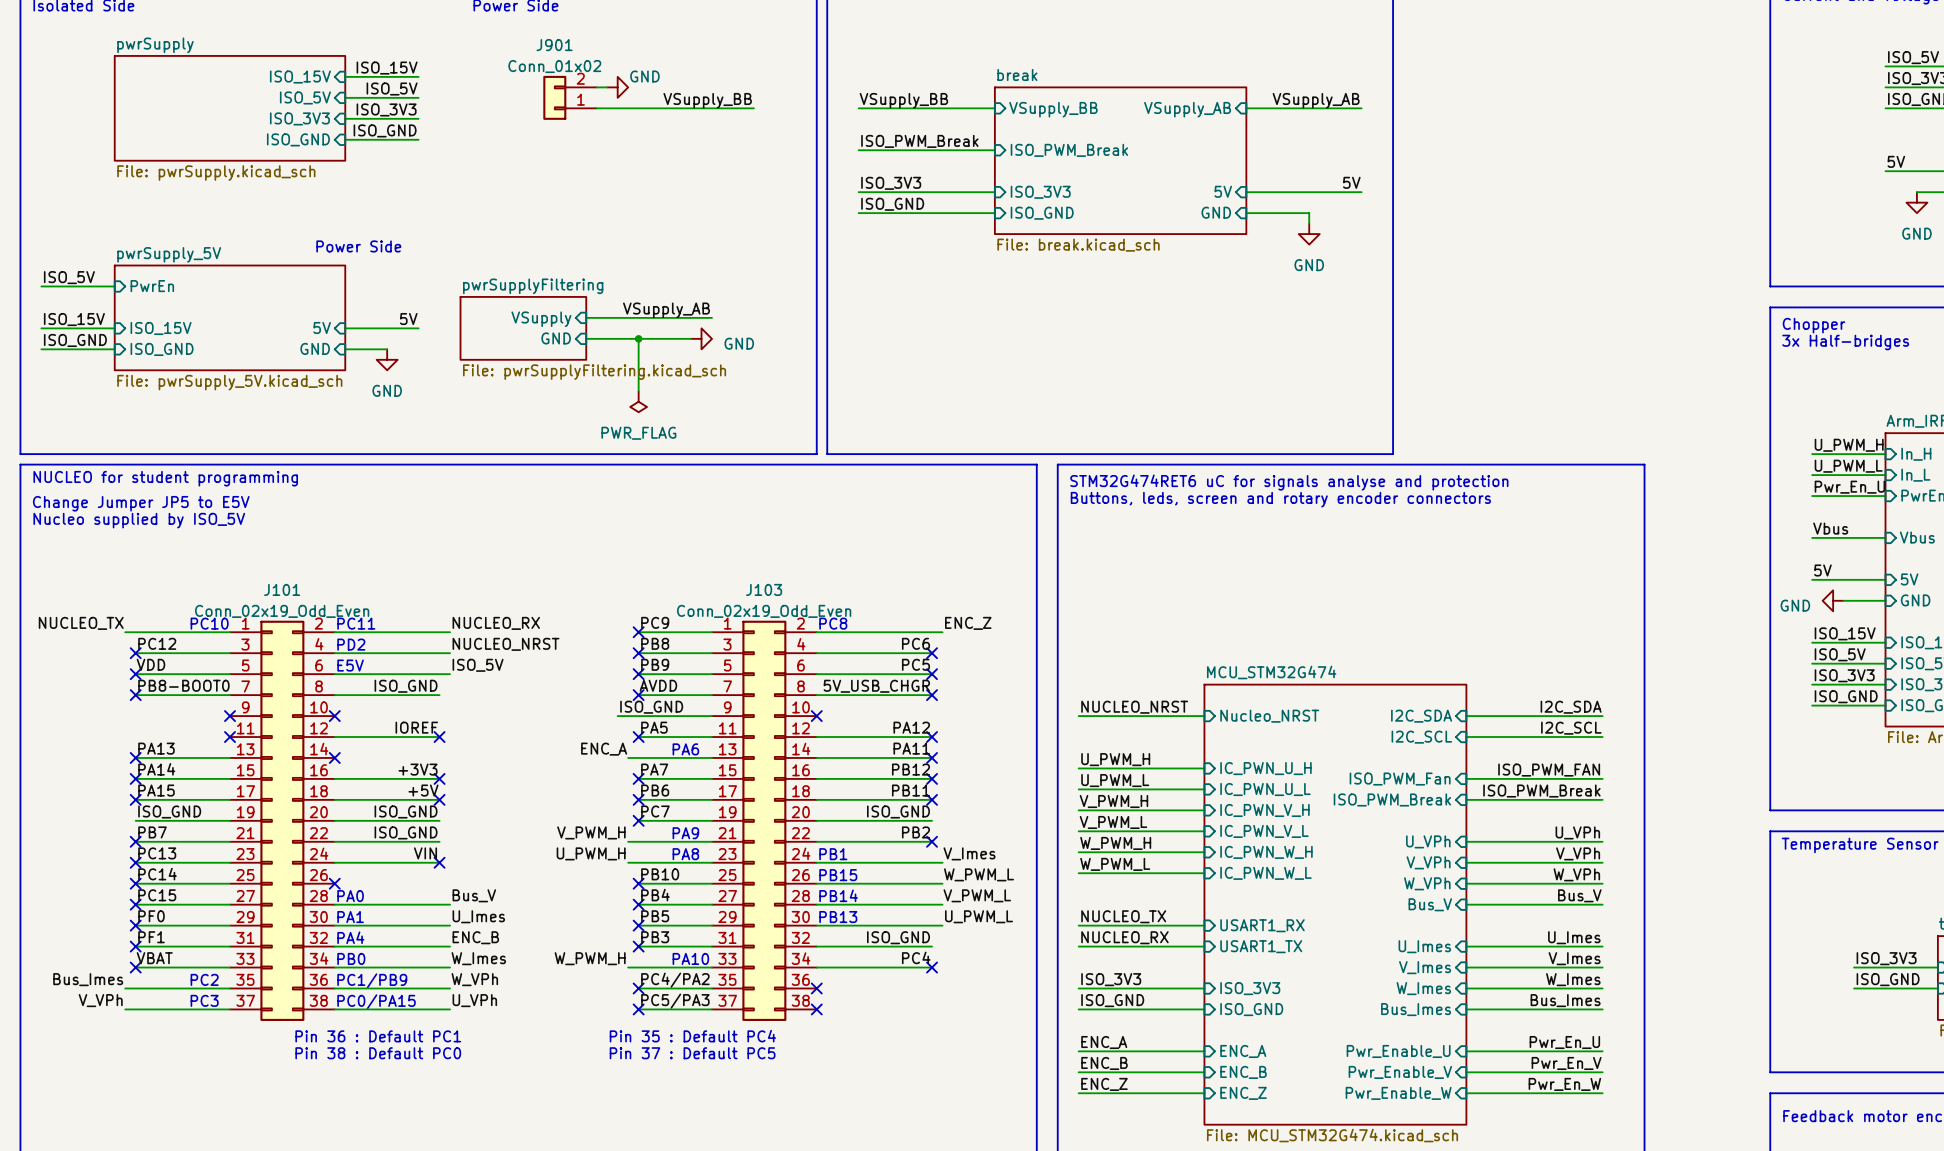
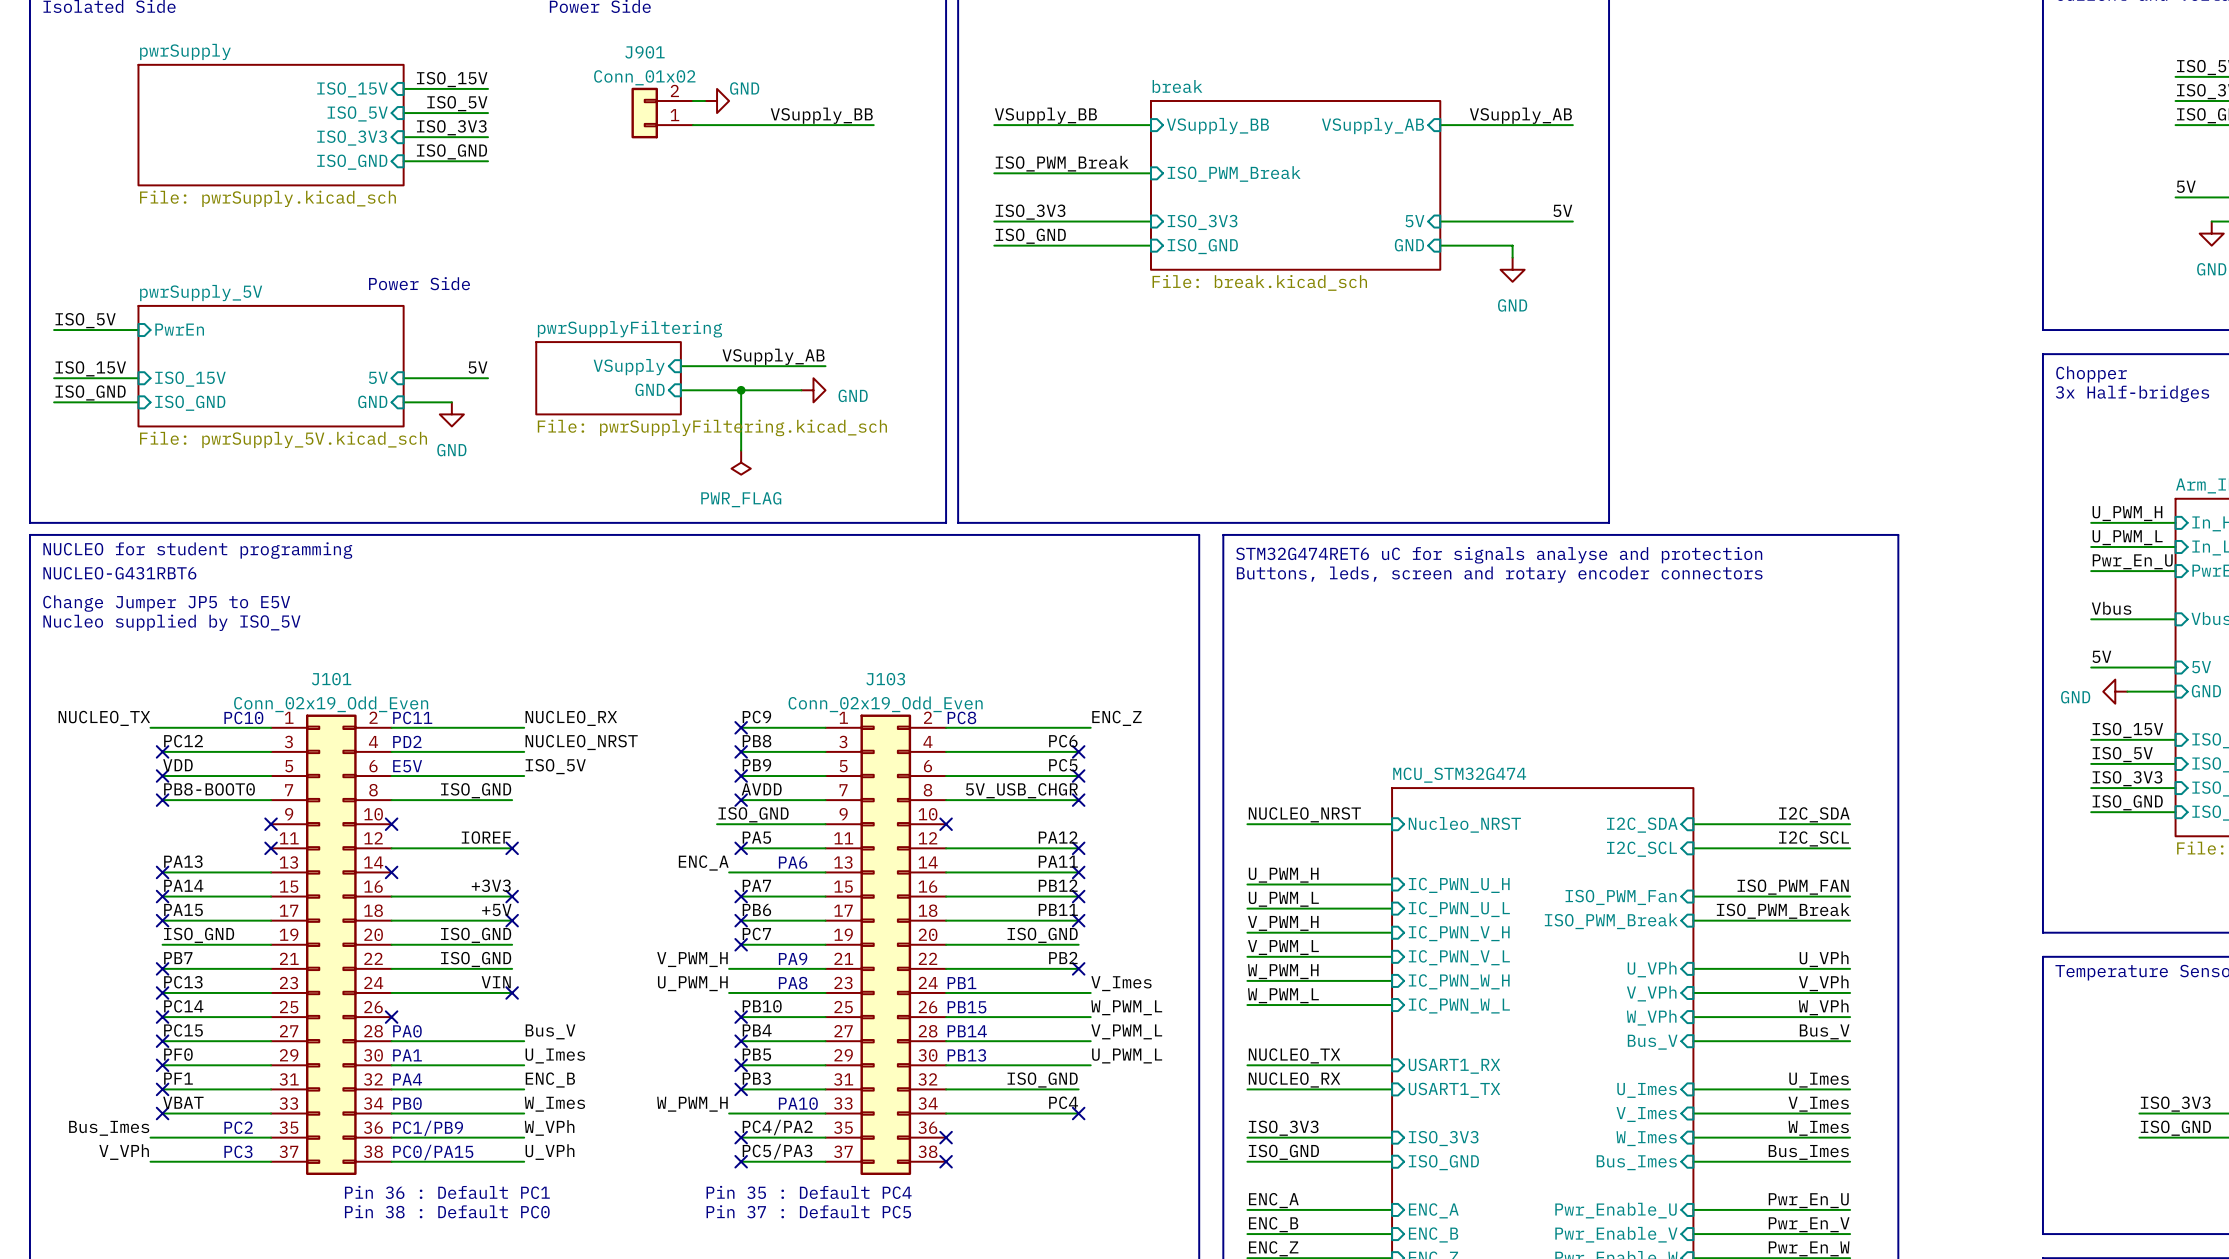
text: Change Jumper JP5 to E5V (141, 503) -> NUCLEO-G431RBT6 (119, 573)
text: Nucleo supplied by ISO_5V (139, 520) -> Change Jumper JP5 to E5V (166, 603)
text: none -> Nucleo supplied by ISO_5V (171, 622)

